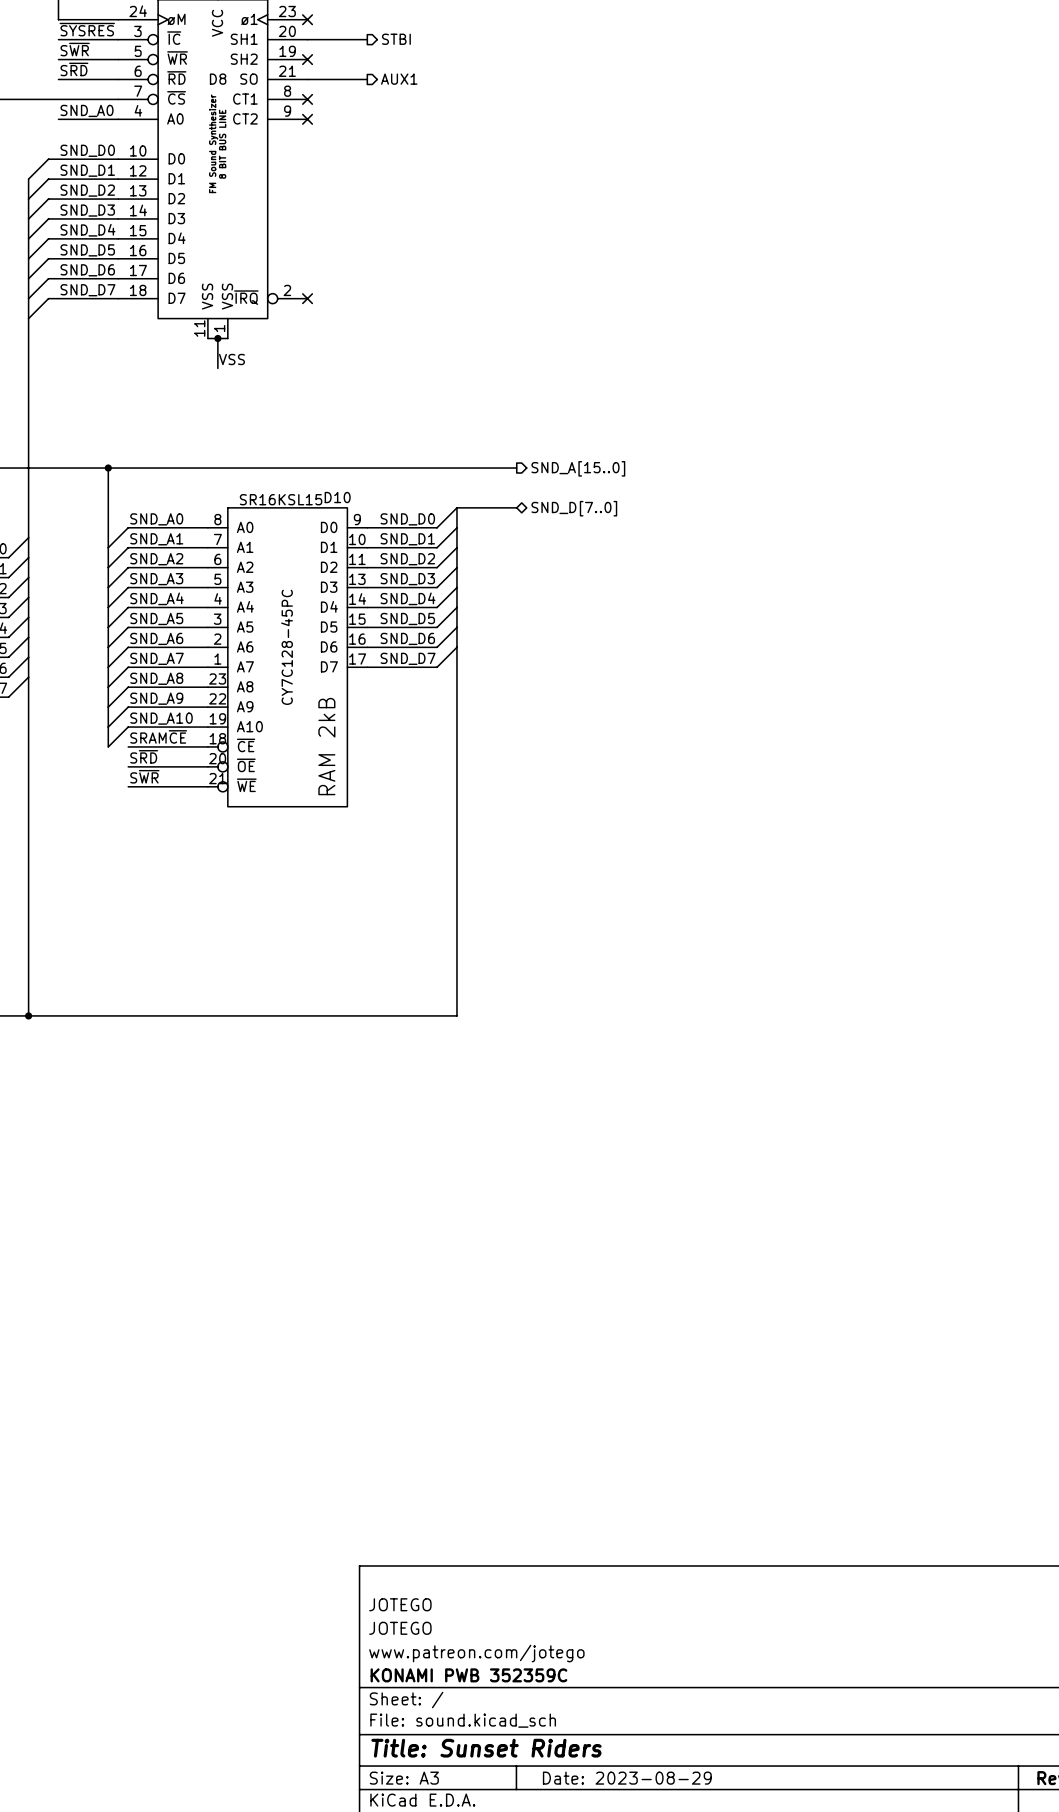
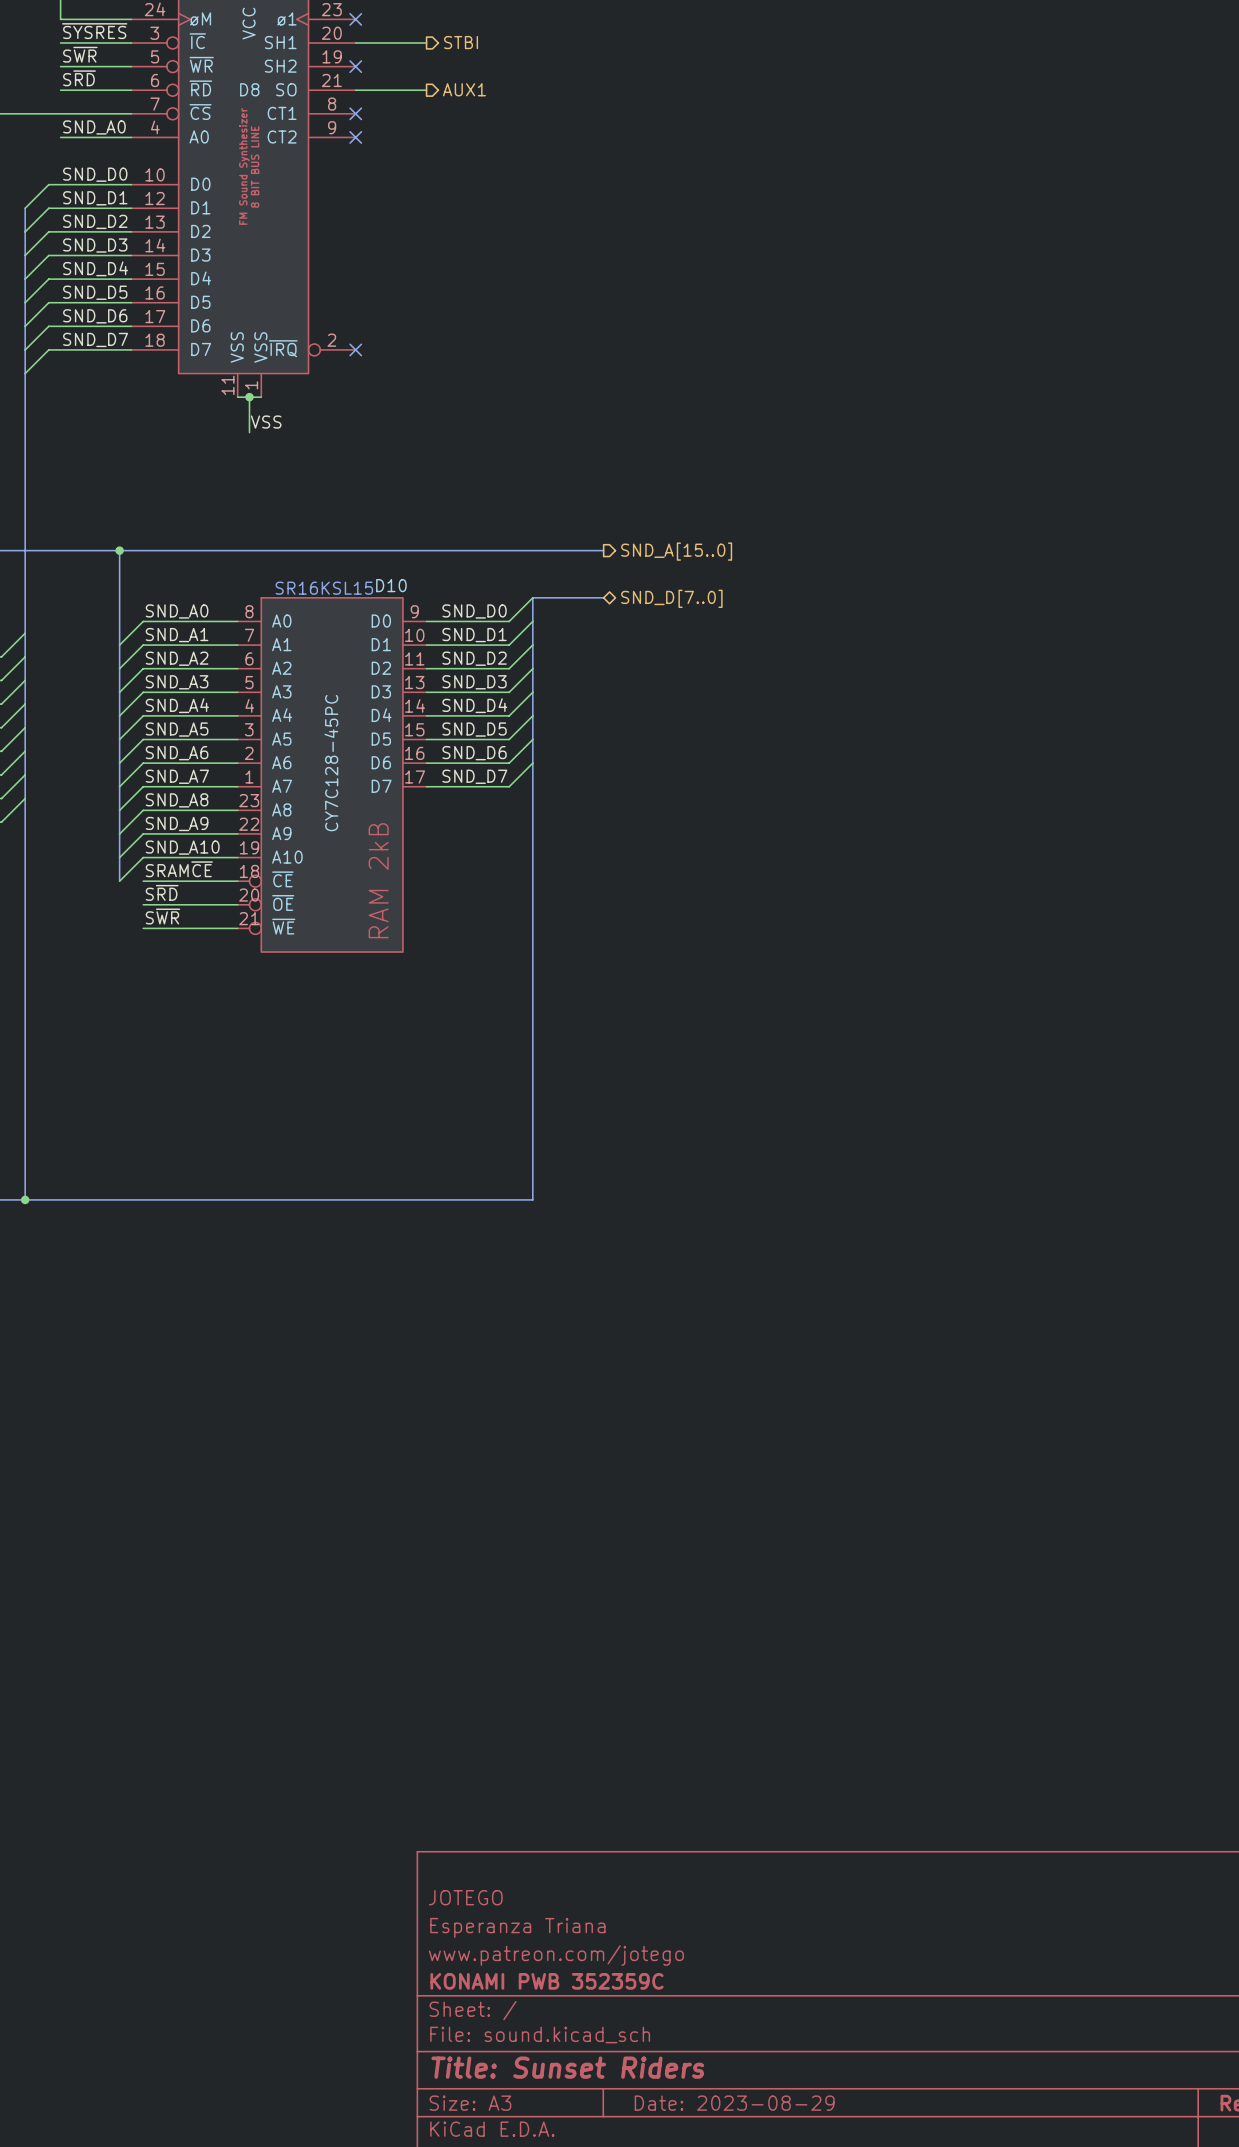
title block: JOTEGO (400, 1628) -> Esperanza Triana (517, 1927)

